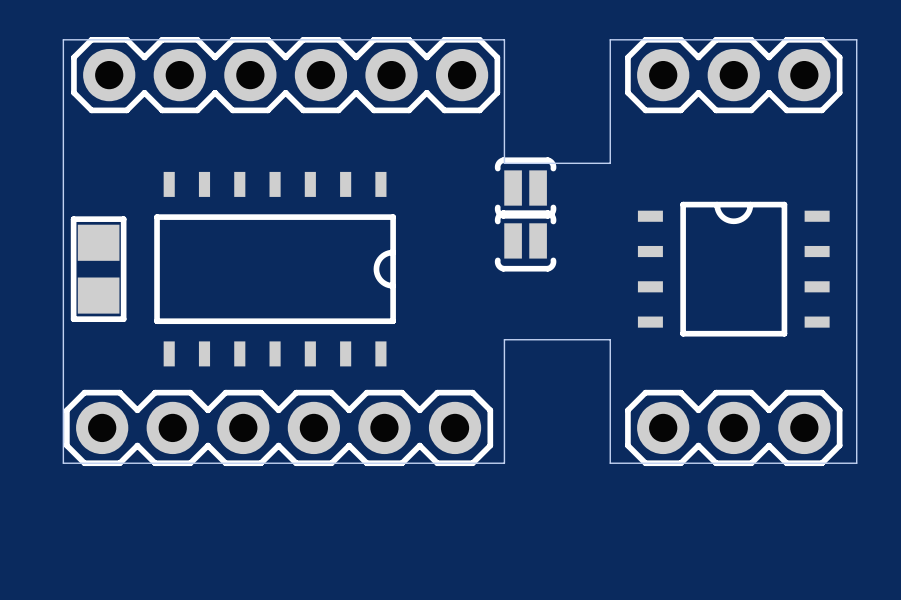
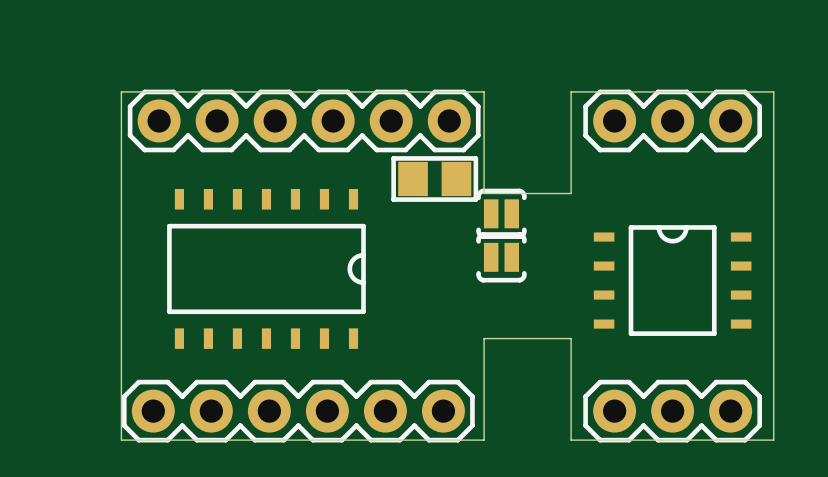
part rotation: 0° (98, 269) -> 90° clockwise (434, 179)
part position: (98, 269) -> (434, 179)
part position: (275, 269) -> (266, 268)

